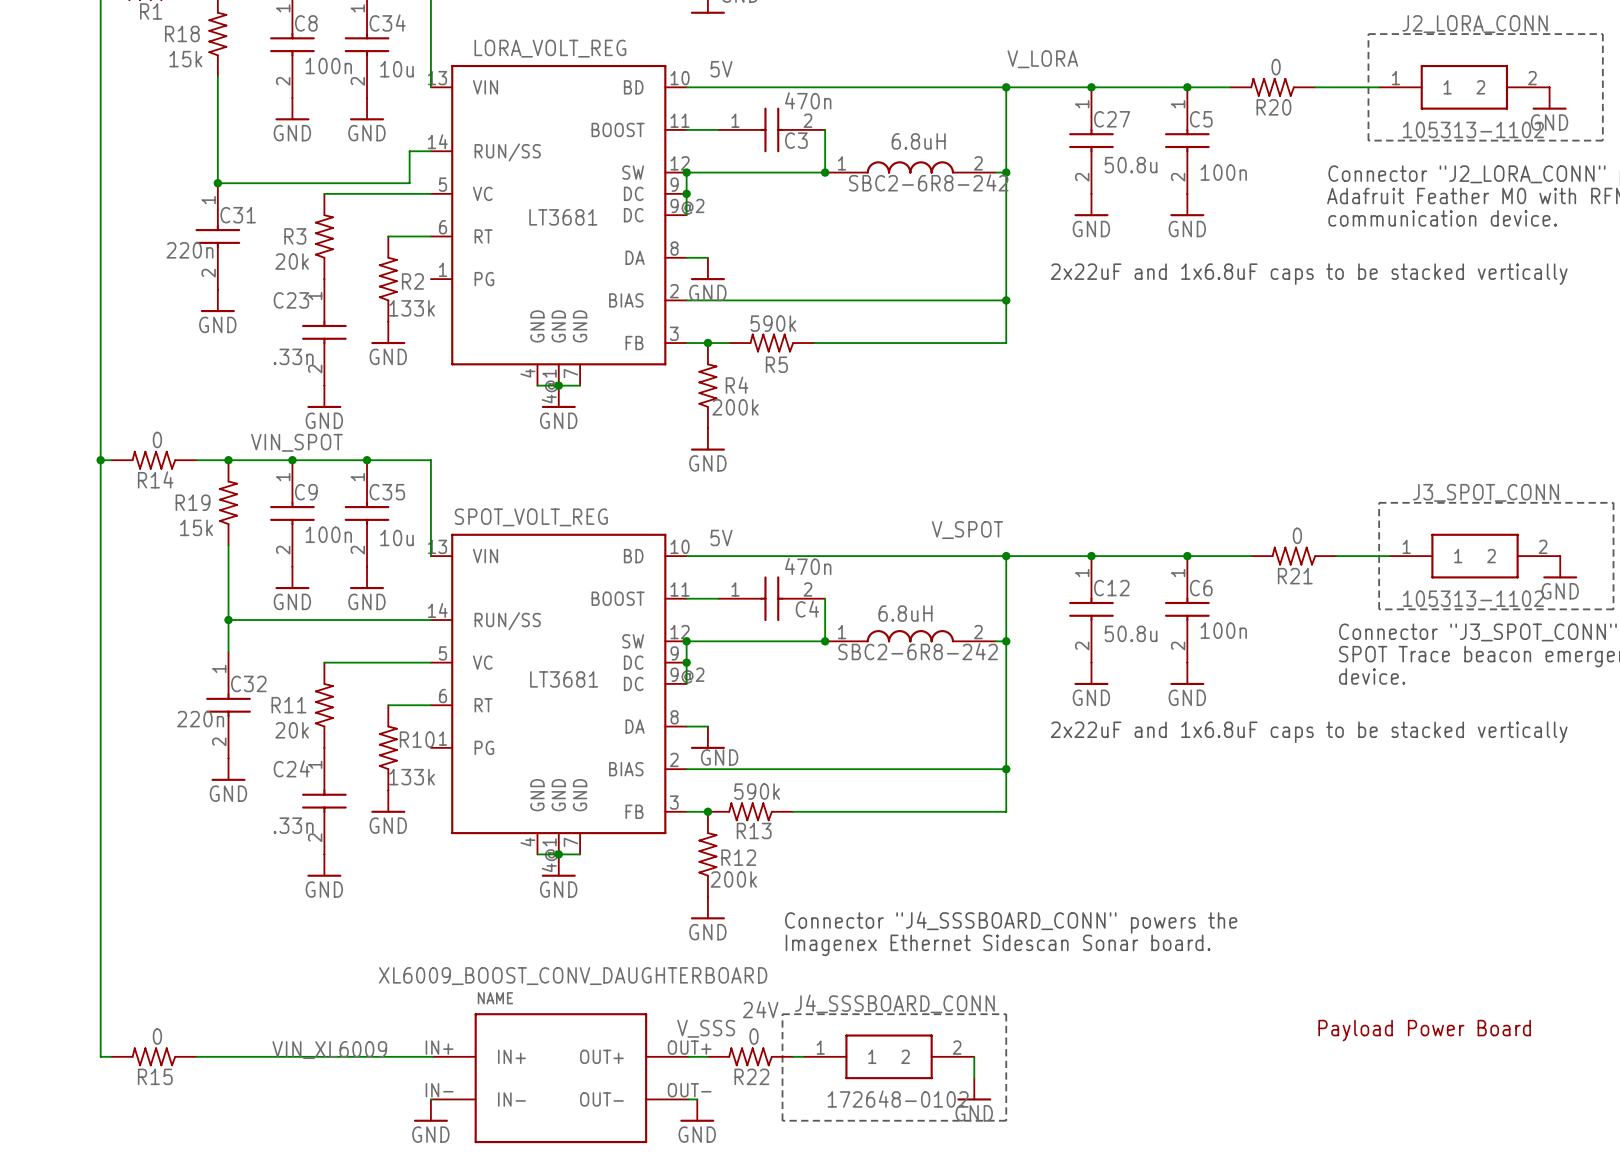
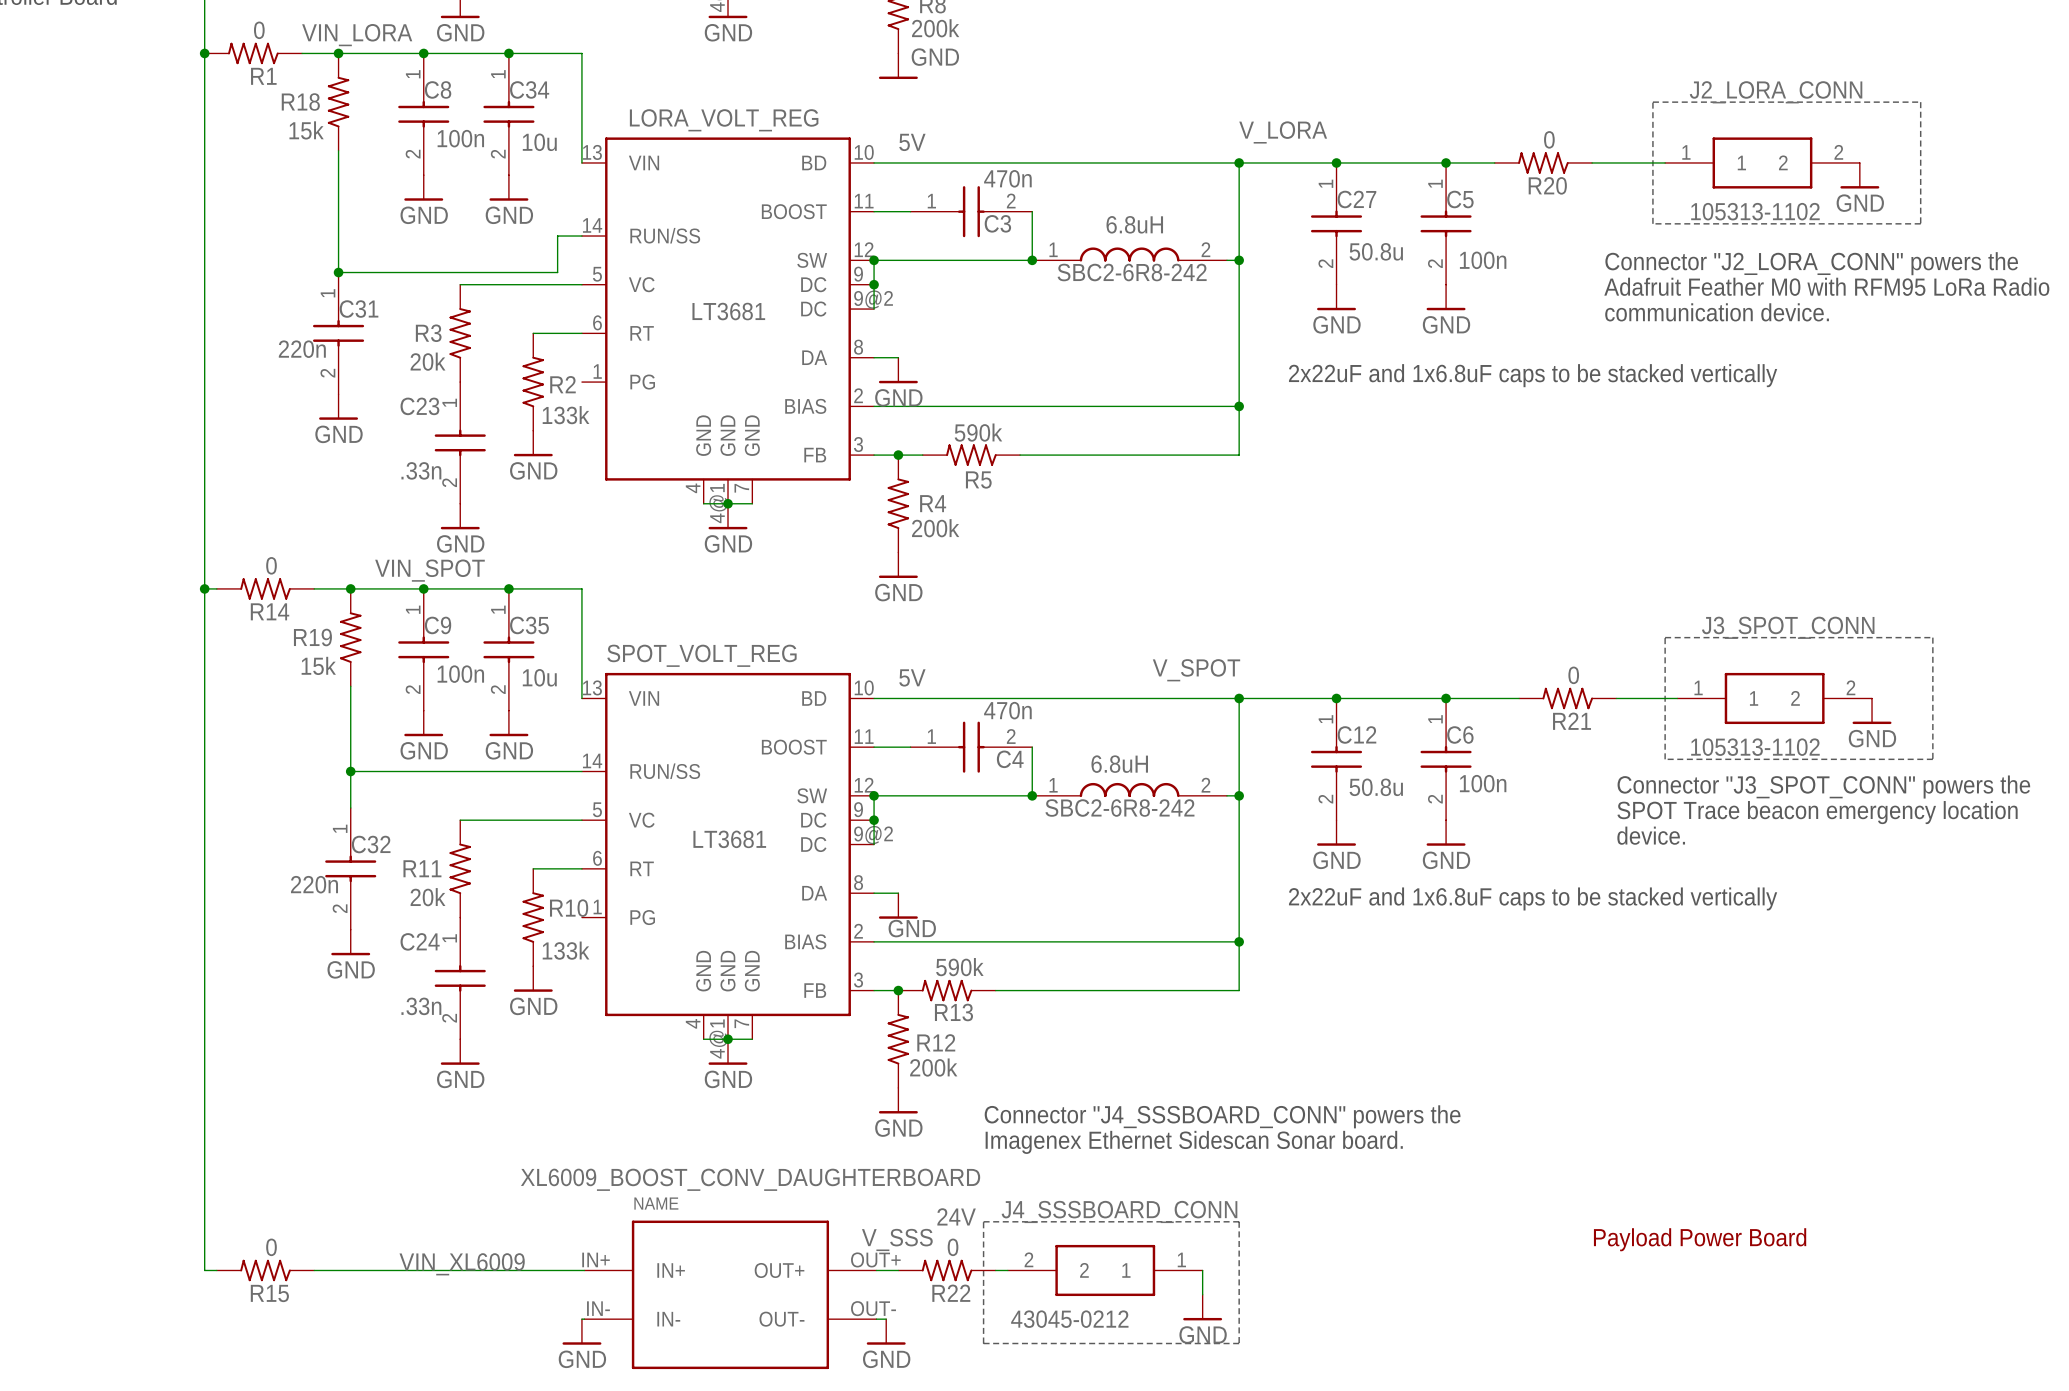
J4_SSSBOARD_CONN rotation: 0° (889, 1056) -> 180° (1105, 1270)
J4_SSSBOARD_CONN value: 172648-0102 (898, 1099) -> 43045-0212 (1069, 1319)

